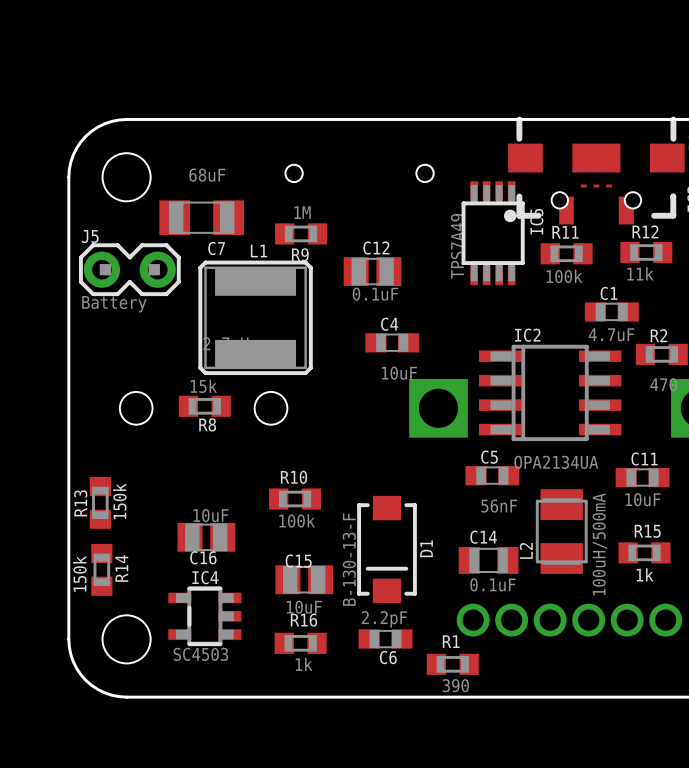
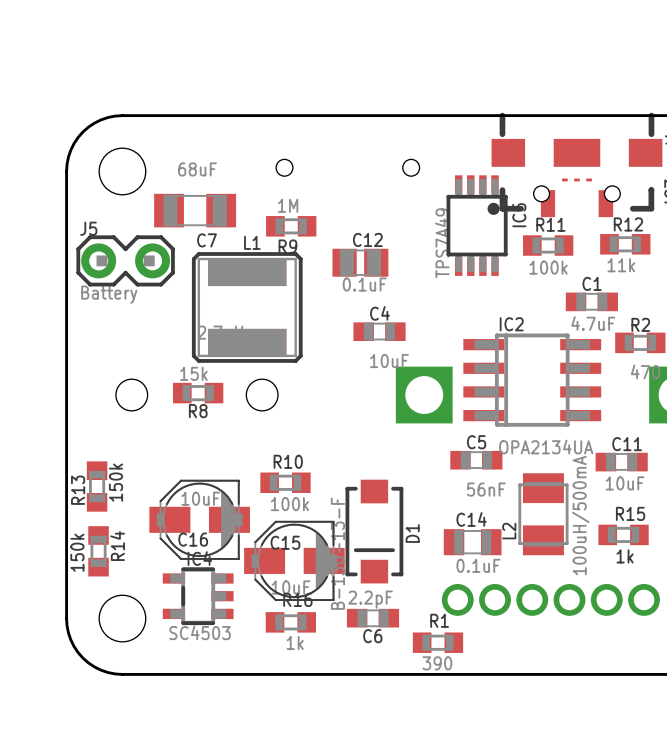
C16 footprint: [177, 522, 236, 552] -> [149, 479, 250, 560]
C15 footprint: [275, 565, 334, 595] -> [244, 520, 345, 601]

